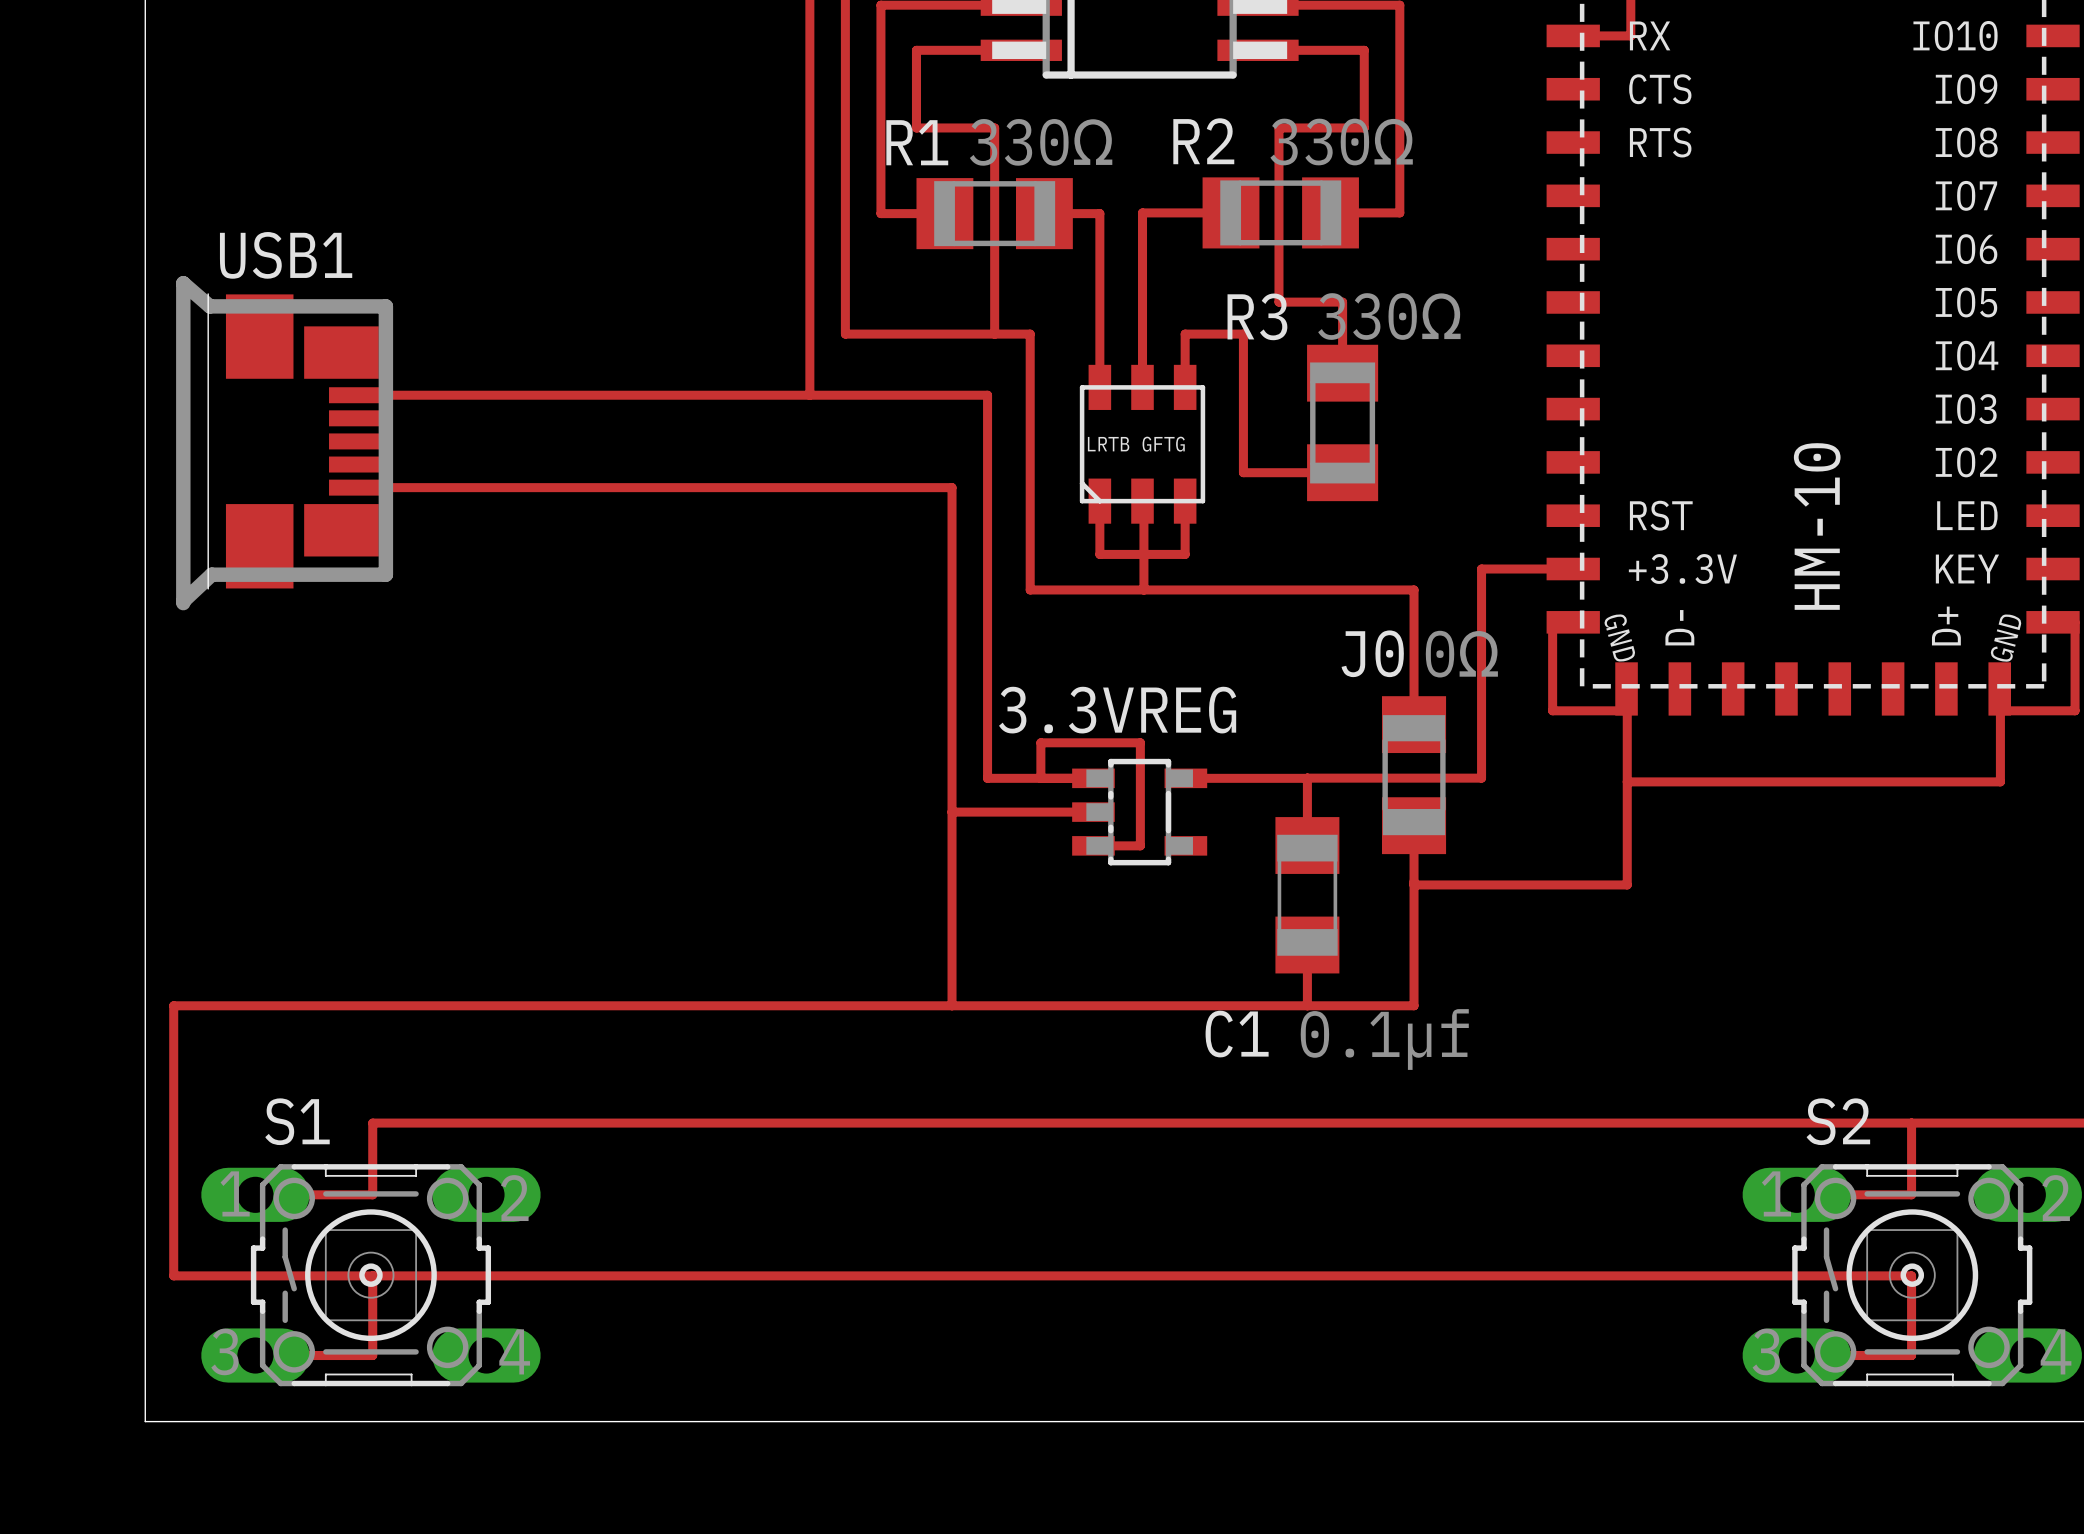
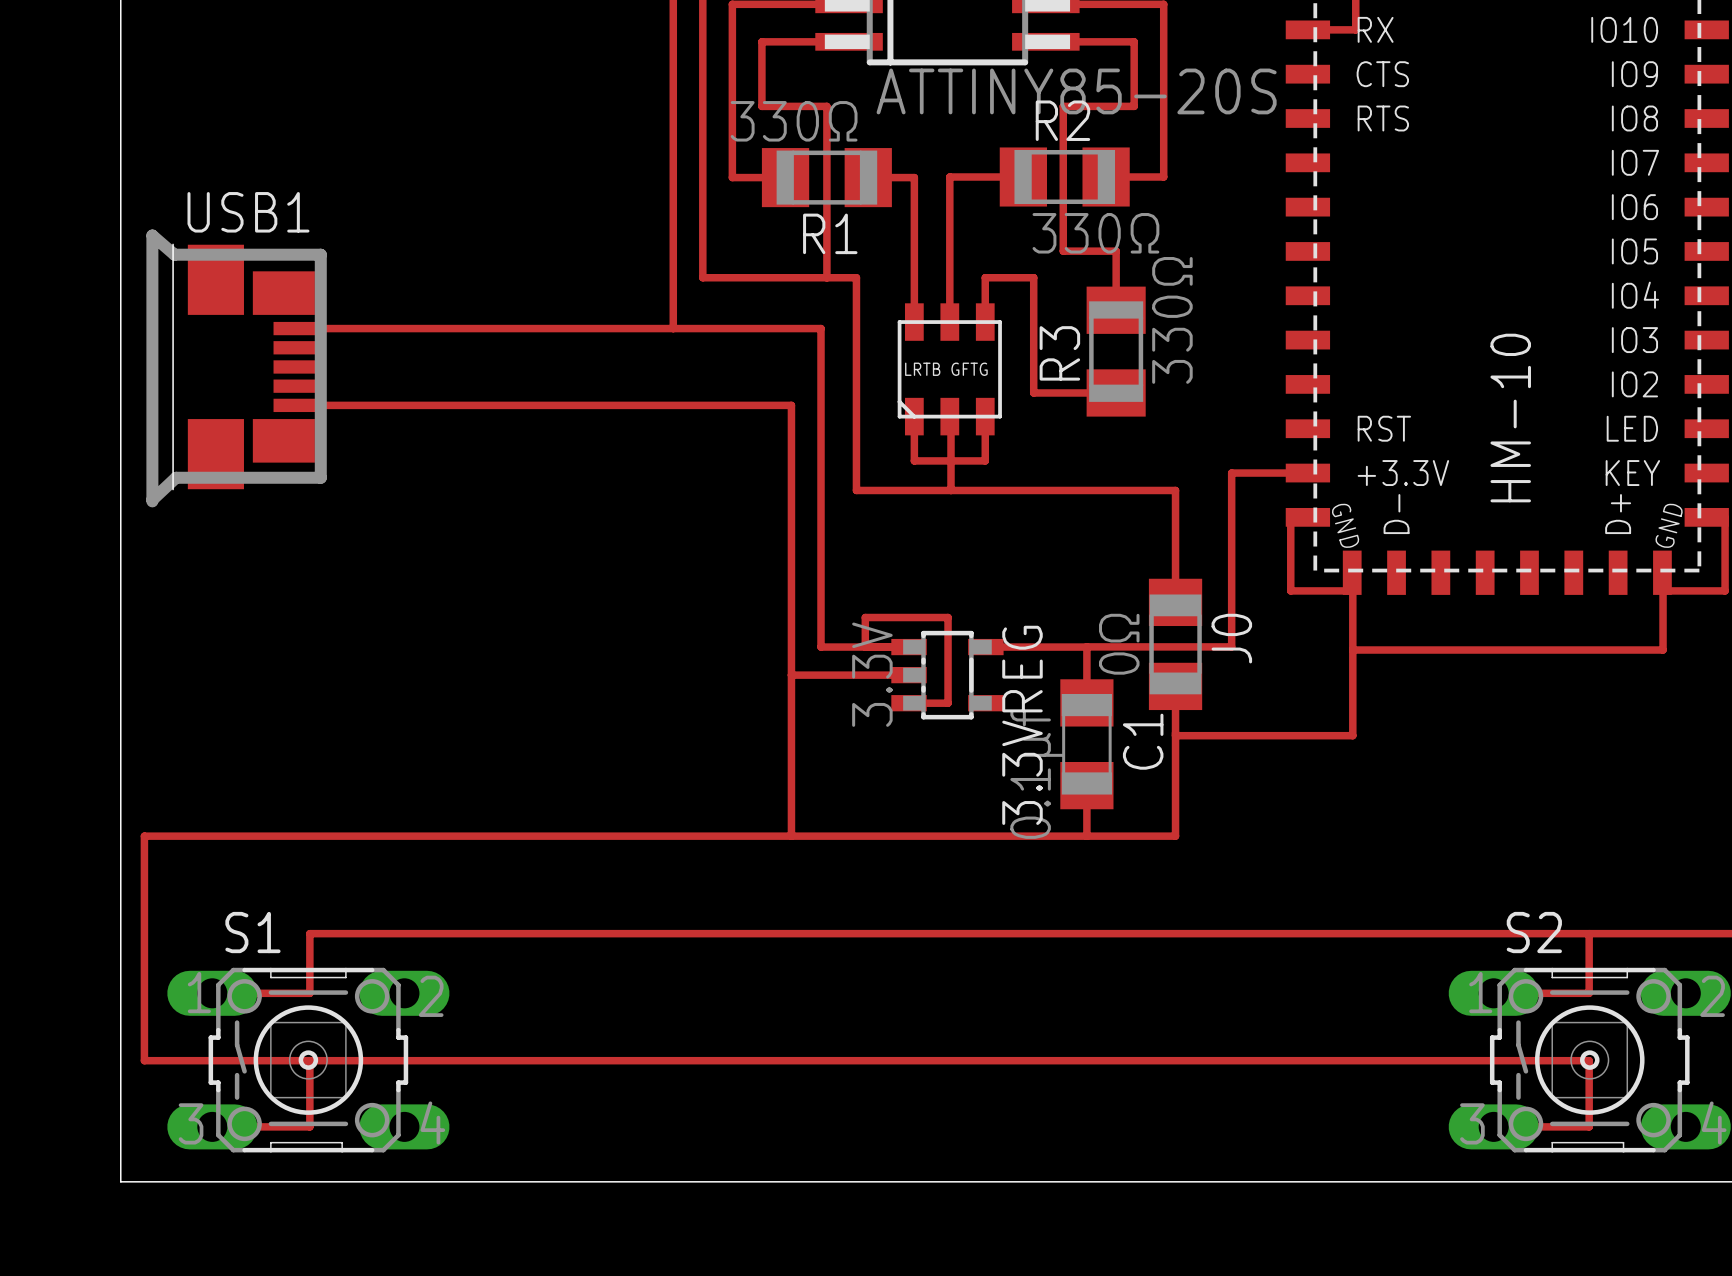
part value: none -> ATTINY85-20S (1076, 91)
R2 name position: R2 (1203, 141) -> R2 (1062, 120)
R1 name position: R1 (917, 142) -> R1 (830, 233)
R1 value position: 330Ω (1041, 142) -> 330Ω (794, 121)
R2 value position: 330Ω (1341, 142) -> 330Ω (1095, 233)
R3 name rotation: 0° (1257, 316) -> 90° counterclockwise (1059, 353)
R3 name position: R3 (1257, 316) -> R3 (1059, 353)
R3 value rotation: 0° (1389, 316) -> 90° counterclockwise (1172, 320)
J0 name rotation: 0° (1372, 653) -> 90° counterclockwise (1231, 638)
J0 name position: J0 (1372, 653) -> J0 (1231, 638)
J0 value rotation: 0° (1461, 654) -> 90° counterclockwise (1119, 644)
J0 value position: 0Ω (1461, 654) -> 0Ω (1119, 644)
3.3VREG name rotation: 0° (1117, 710) -> 90° counterclockwise (1022, 725)
3.3VREG value: none -> 3.3V (872, 674)
C1 name rotation: 0° (1237, 1034) -> 90° counterclockwise (1143, 741)
C1 name position: C1 (1237, 1034) -> C1 (1143, 741)
C1 value rotation: 0° (1384, 1039) -> 90° counterclockwise (1036, 774)

